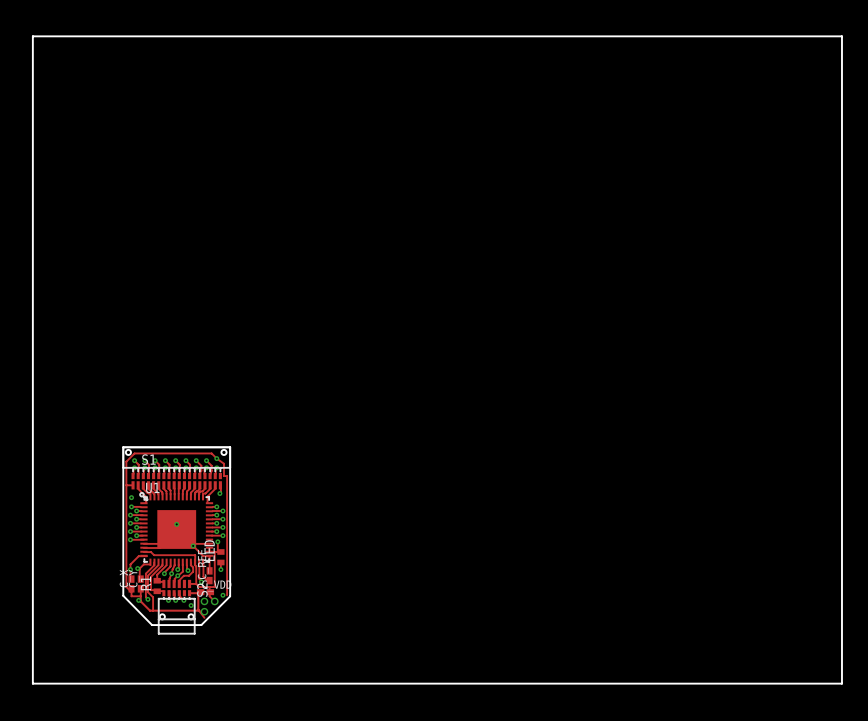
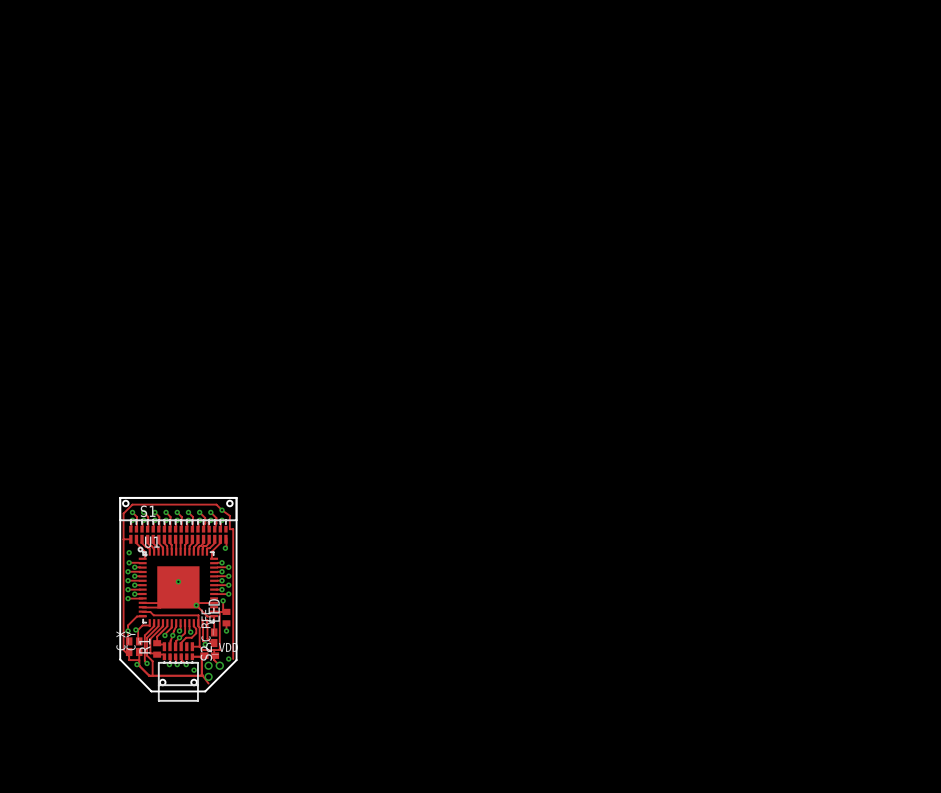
board edge: (32, 36) (841, 36) (841, 683) (32, 683) (32, 36) -> none

